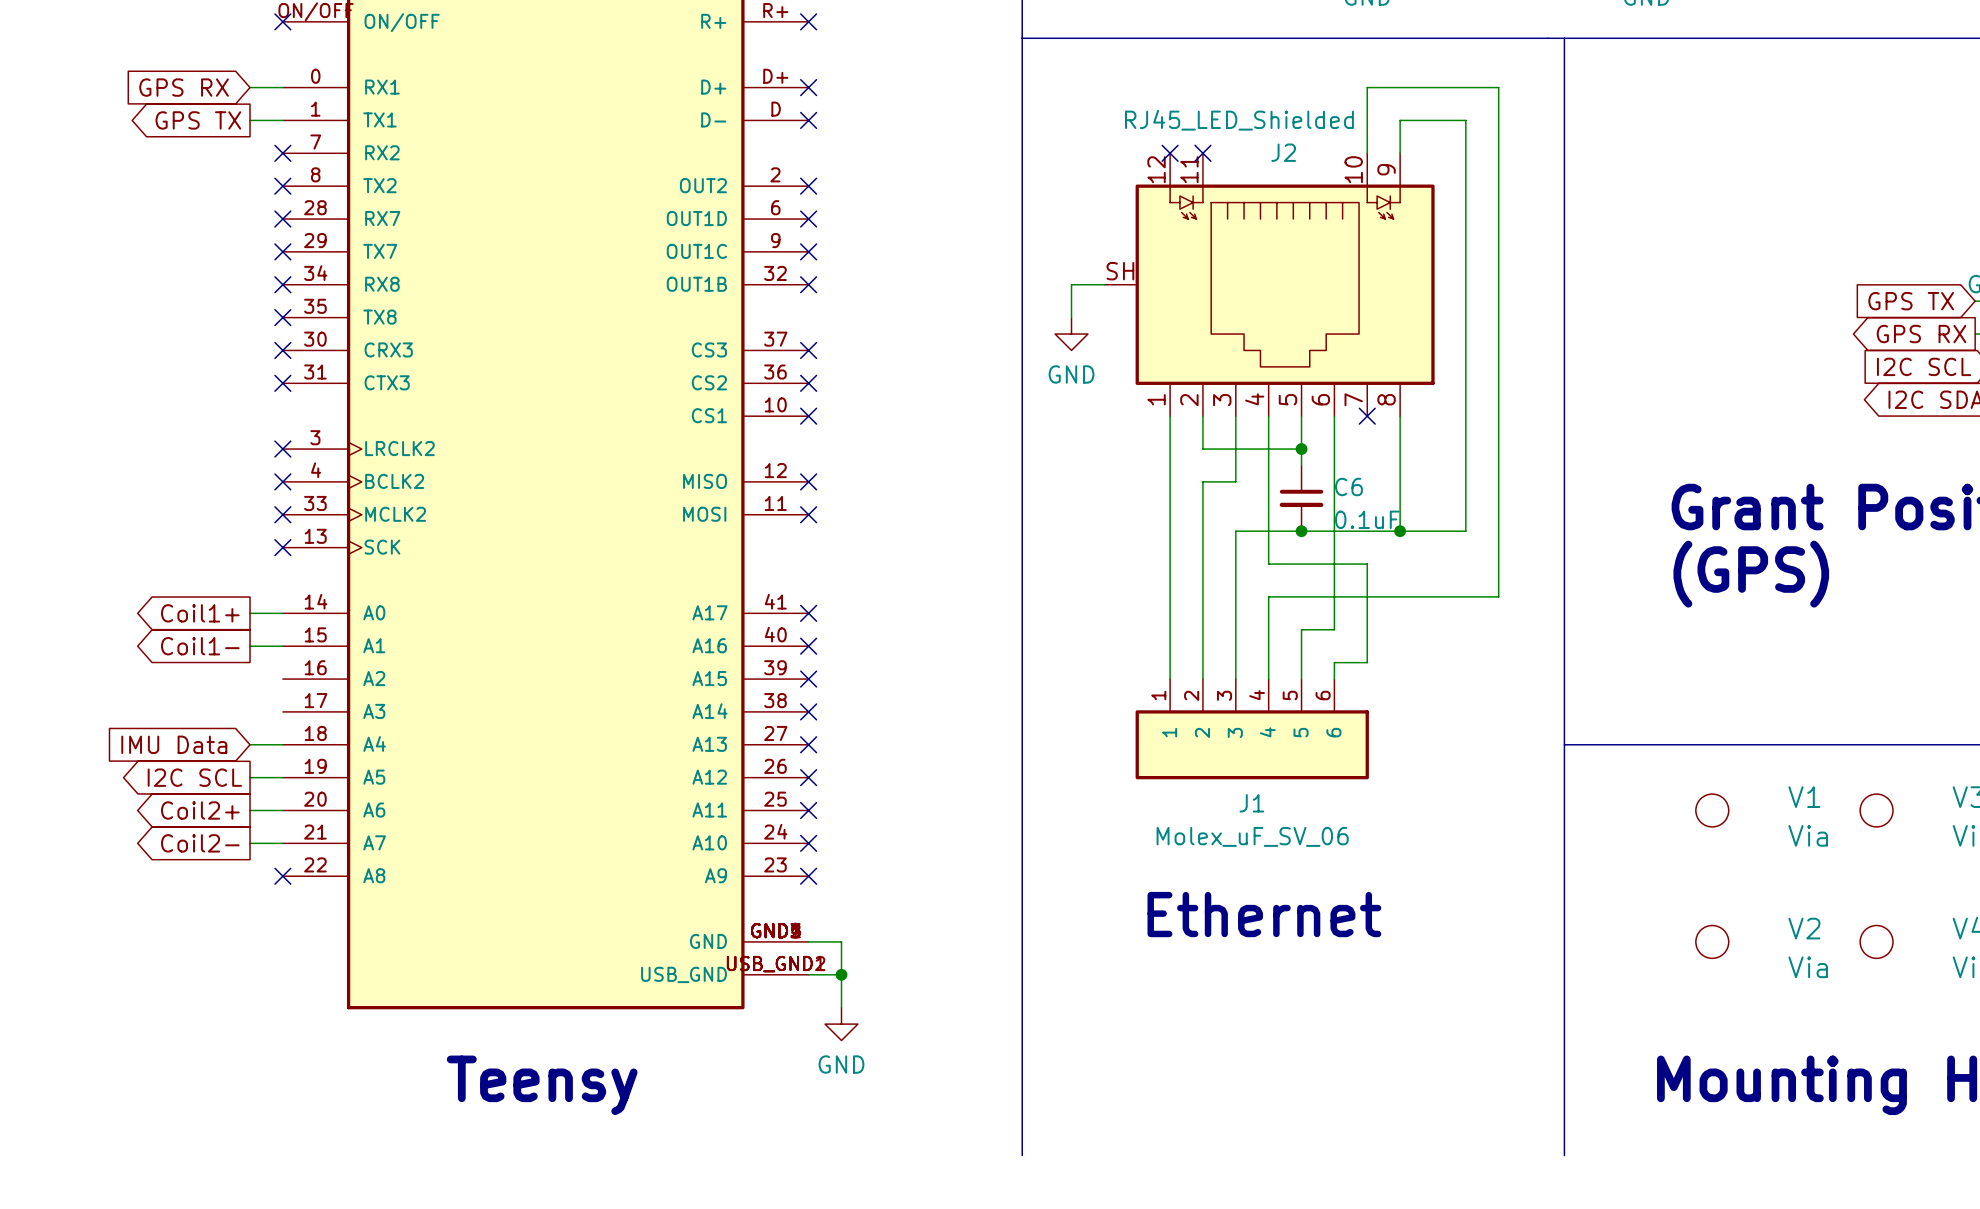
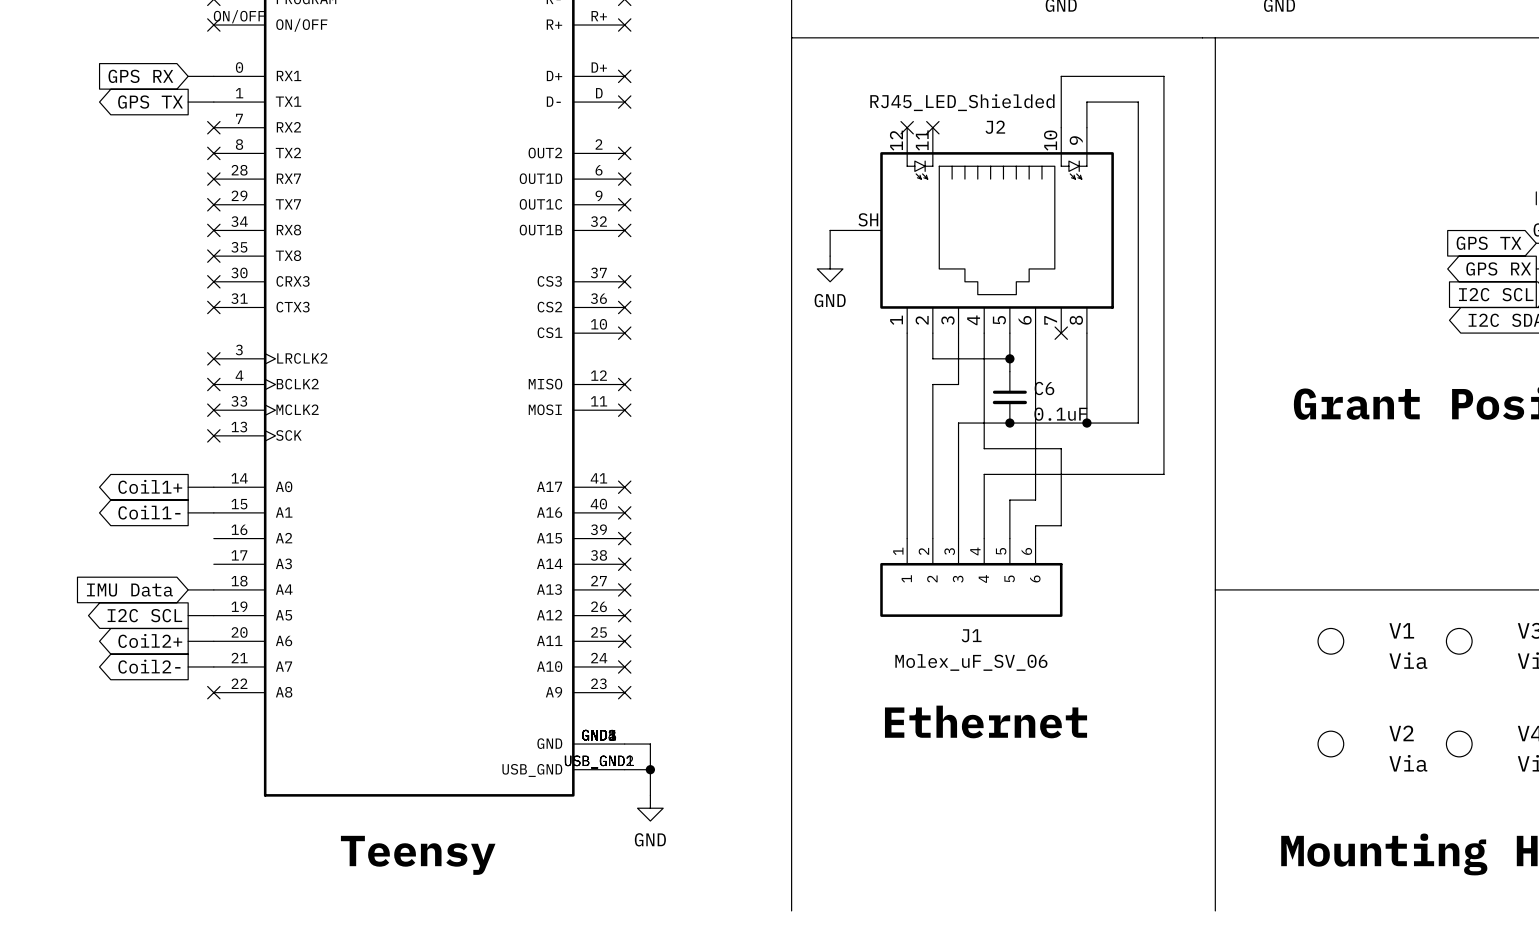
wire: none -> (1536, 191) (1536, 204)
wire: none -> (1536, 281) (1536, 307)
text: (GPS) (1751, 574) -> none

